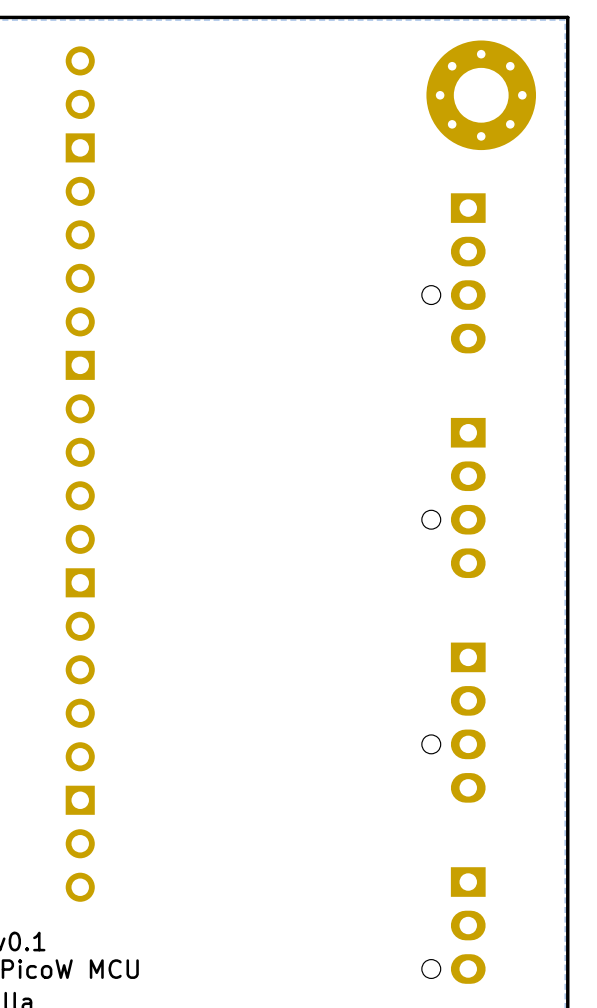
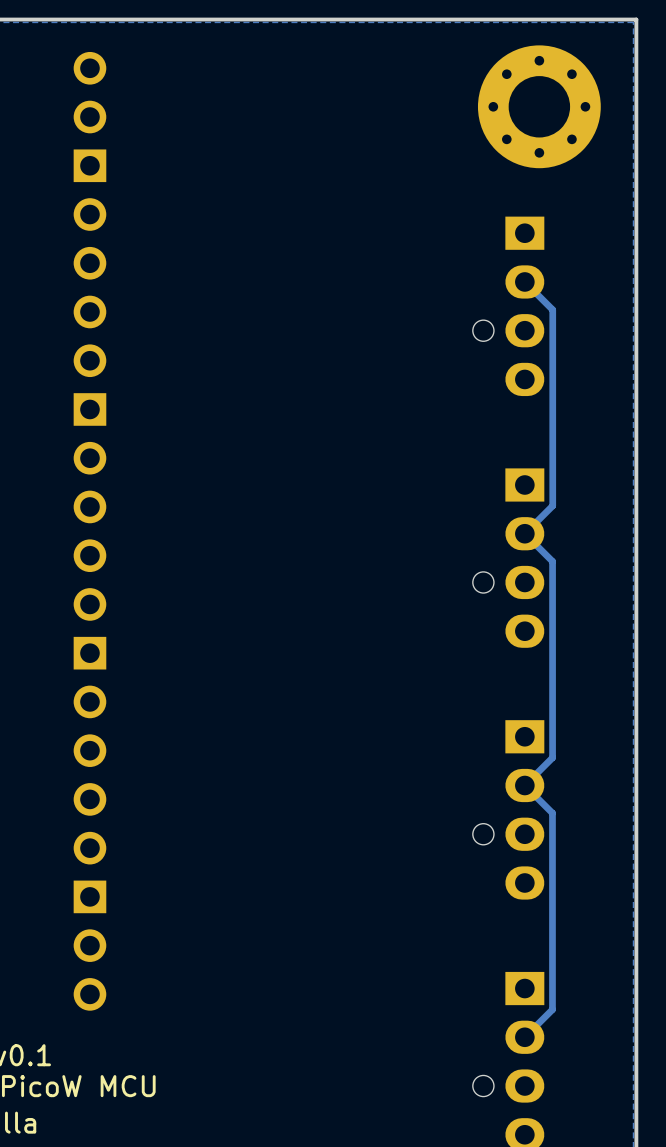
track: none -> (524, 281) (552, 309) (552, 505) (524, 533) (552, 561) (552, 757) (524, 785) (552, 813) (552, 1009) (524, 1037)

